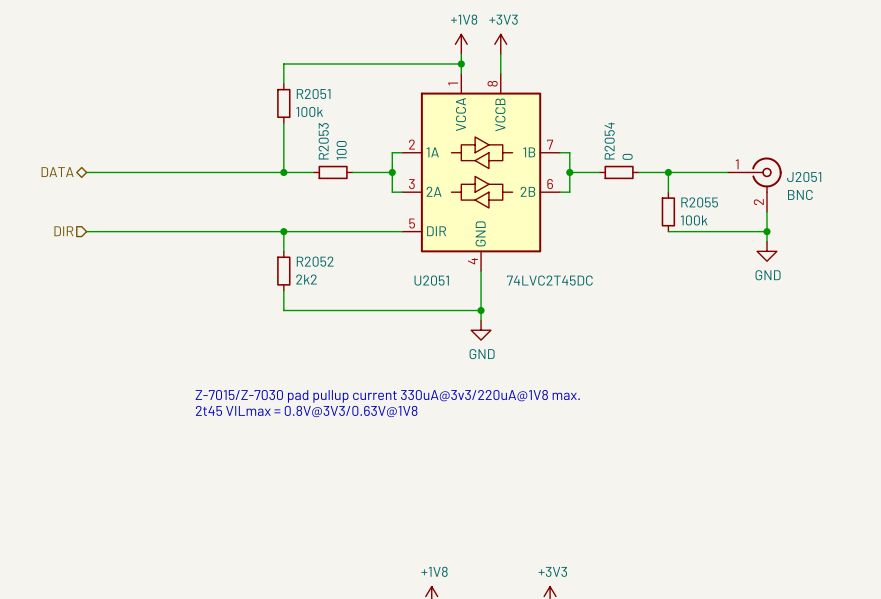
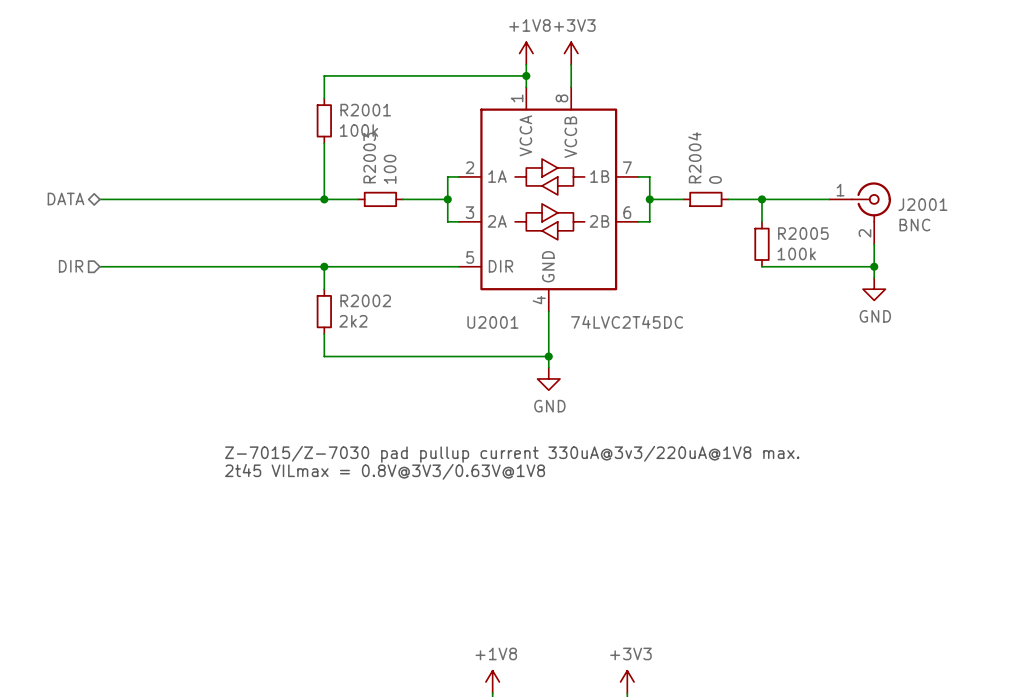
R2051 name: R2051 (313, 94) -> R2001 (365, 110)
R2053 name: R2053 (323, 141) -> R2003 (369, 158)
R2054 name: R2054 (609, 141) -> R2004 (694, 157)
J2051 name: J2051 (804, 177) -> J2001 (922, 204)
R2055 name: R2055 (699, 202) -> R2005 (803, 233)
R2052 name: R2052 (315, 261) -> R2002 (365, 300)
U2051 name: U2051 (431, 280) -> U2001 (492, 322)

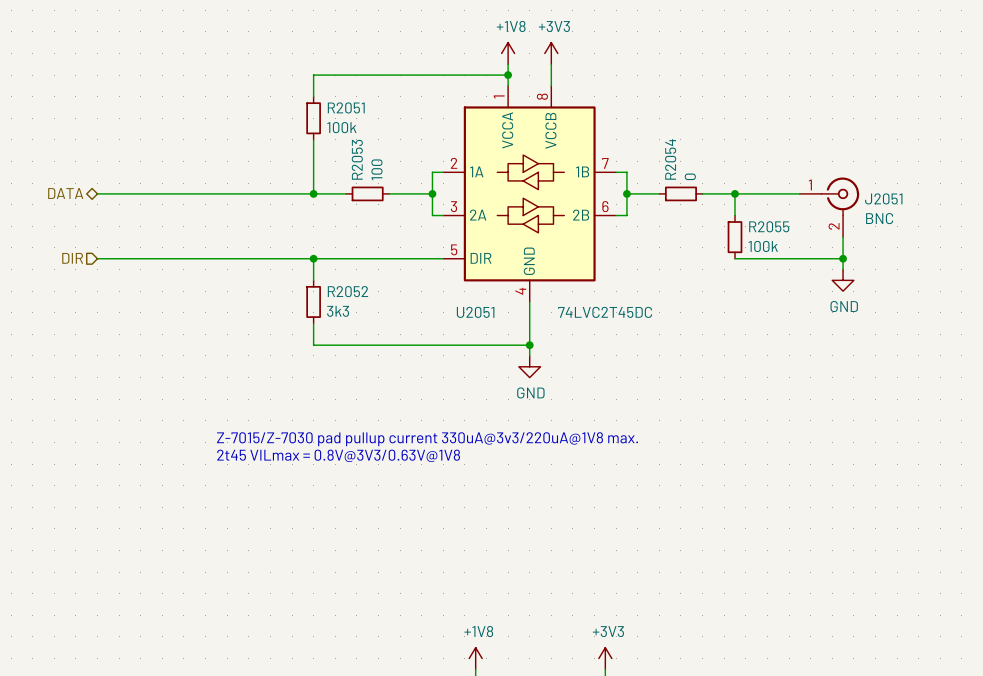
R2001 name: R2001 (365, 110) -> R2051 (346, 107)
R2004 name: R2004 (694, 157) -> R2054 (670, 159)
R2003 name: R2003 (369, 158) -> R2053 (357, 159)
J2001 name: J2001 (922, 204) -> J2051 (883, 198)
R2005 name: R2005 (803, 233) -> R2055 (769, 226)
R2002 name: R2002 (365, 300) -> R2052 (347, 291)
R2002 value: 2k2 (353, 321) -> 3k3 (338, 311)
U2001 name: U2001 (492, 322) -> U2051 (475, 312)

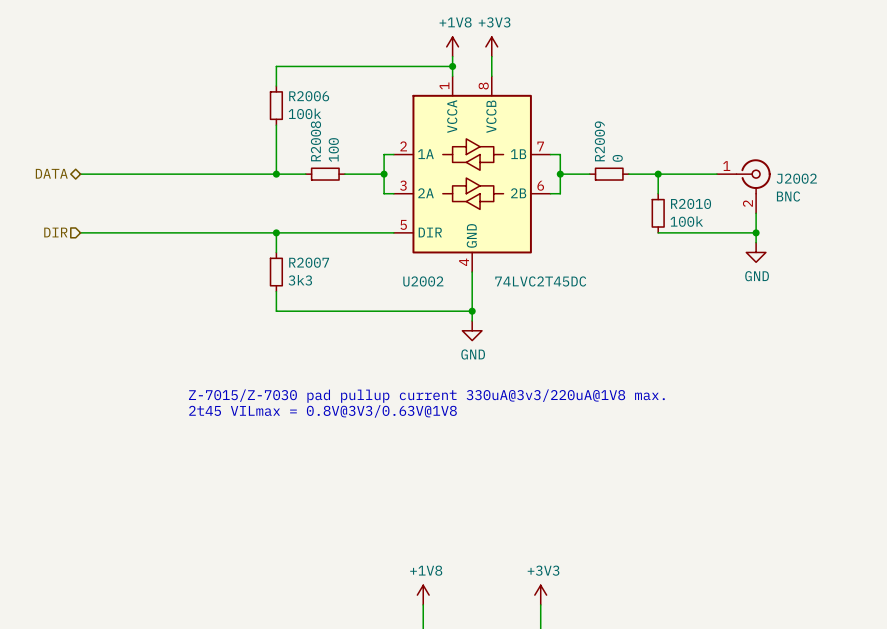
R2051 name: R2051 (346, 107) -> R2006 (309, 96)
R2053 name: R2053 (357, 159) -> R2008 (315, 141)
R2054 name: R2054 (670, 159) -> R2009 (599, 141)
J2051 name: J2051 (883, 198) -> J2002 (796, 178)
R2055 name: R2055 (769, 226) -> R2010 (691, 203)
R2052 name: R2052 (347, 291) -> R2007 (309, 262)
U2051 name: U2051 (475, 312) -> U2002 (423, 281)

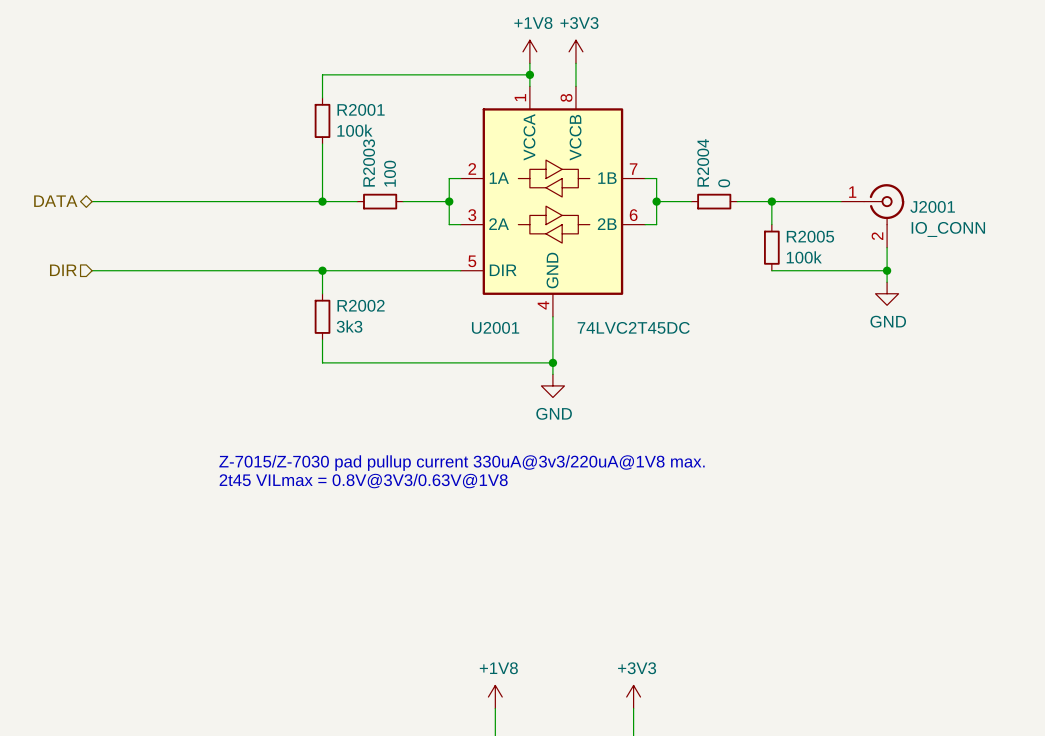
R2006 name: R2006 (309, 96) -> R2001 (361, 109)
R2008 name: R2008 (315, 141) -> R2003 (369, 163)
R2009 name: R2009 (599, 141) -> R2004 (703, 162)
J2002 name: J2002 (796, 178) -> J2001 (932, 206)
J2002 value: BNC (788, 196) -> IO_CONN (948, 229)
R2010 name: R2010 (691, 203) -> R2005 (810, 236)
R2007 name: R2007 (309, 262) -> R2002 (361, 305)
U2002 name: U2002 (423, 281) -> U2001 (495, 327)

